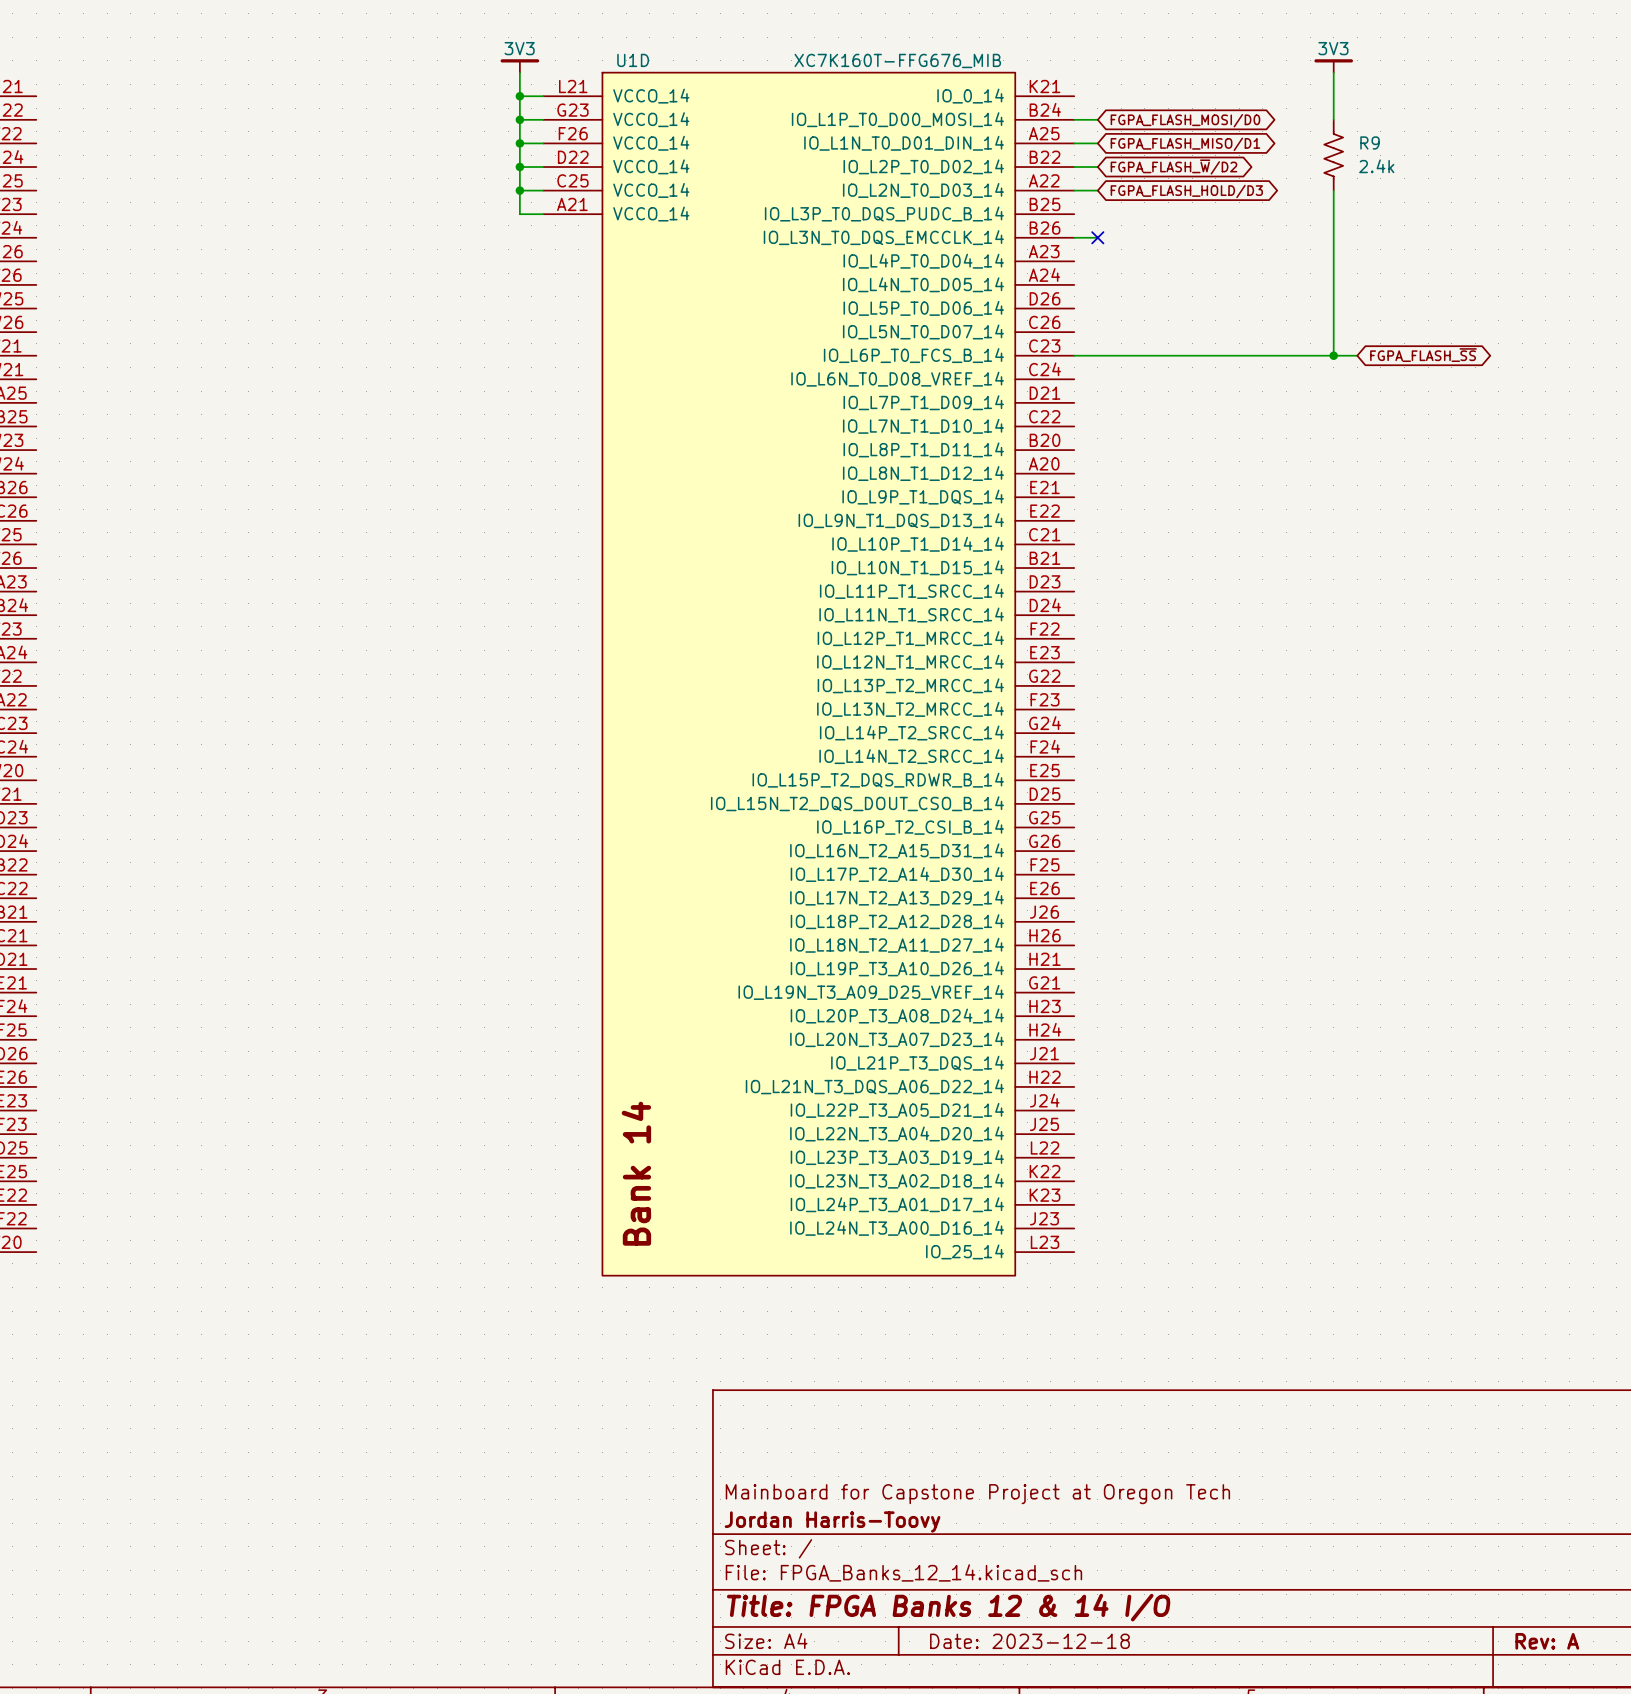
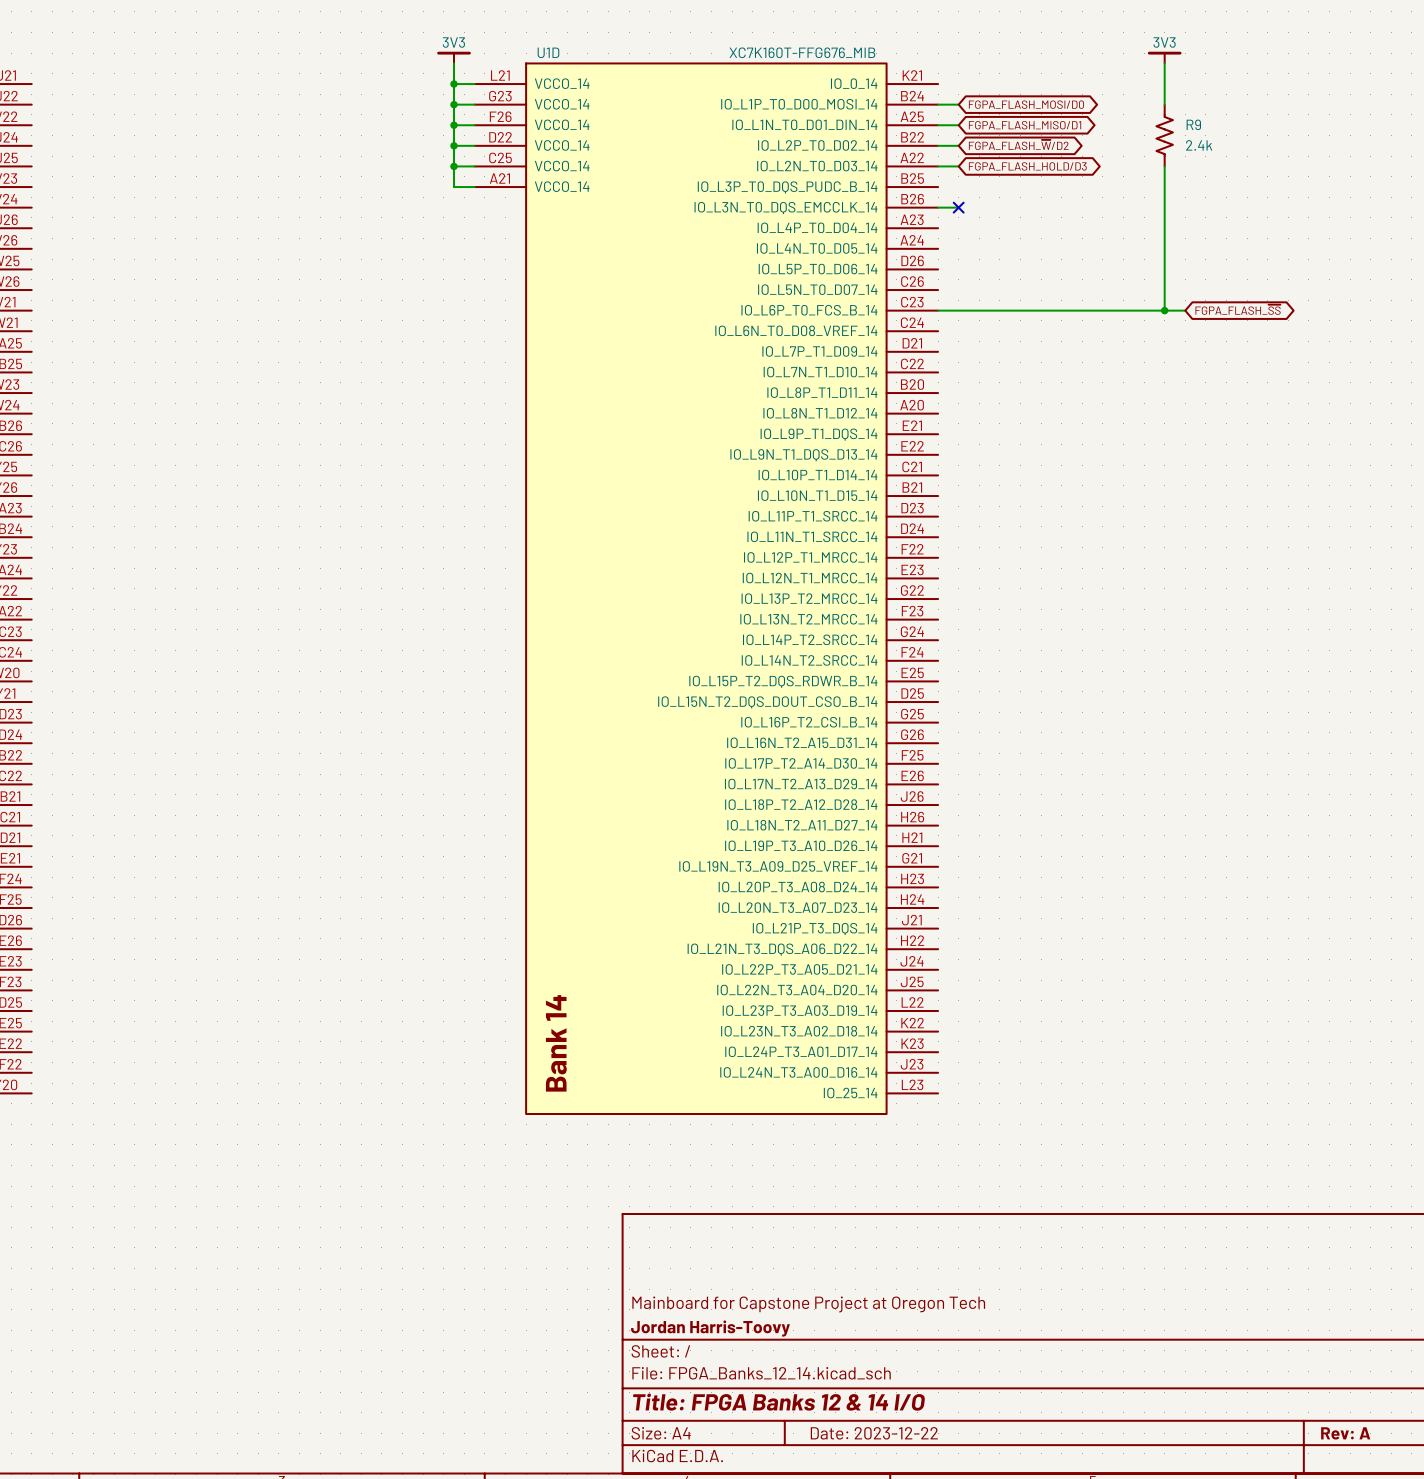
title block: Date: 2023-12-18 (1029, 1641) -> Date: 2023-12-22 (874, 1433)

